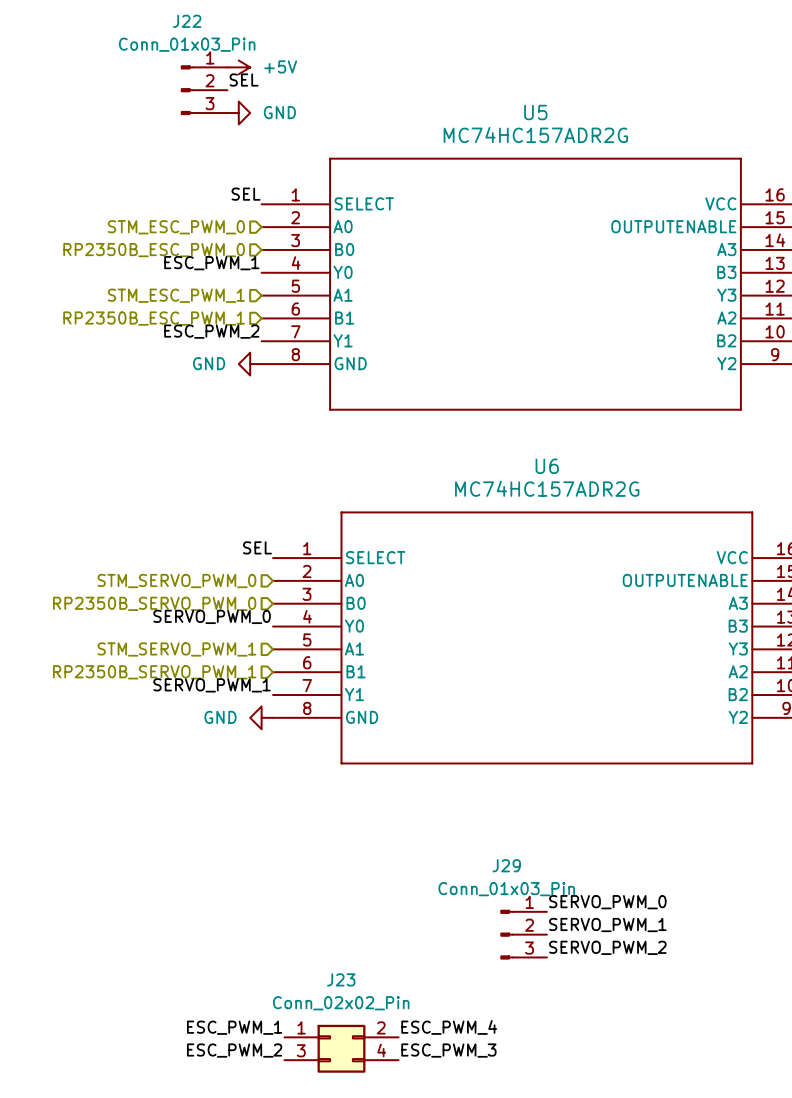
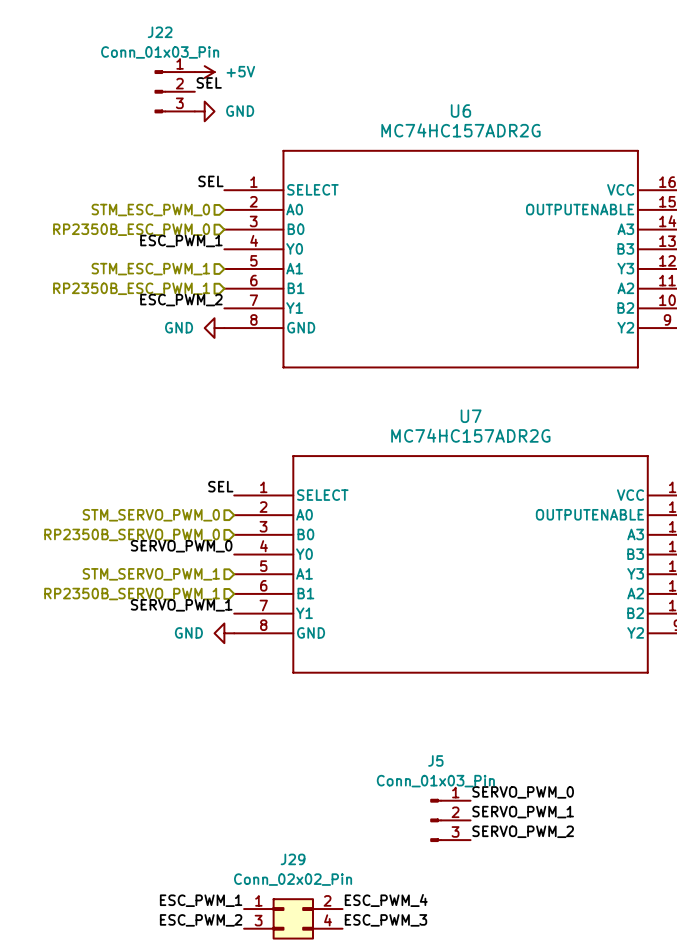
U5 name: U5 (535, 112) -> U6 (460, 111)
U6 name: U6 (547, 466) -> U7 (471, 416)
J29 name: J29 (506, 865) -> J5 (435, 760)
J23 name: J23 (341, 979) -> J29 (293, 859)

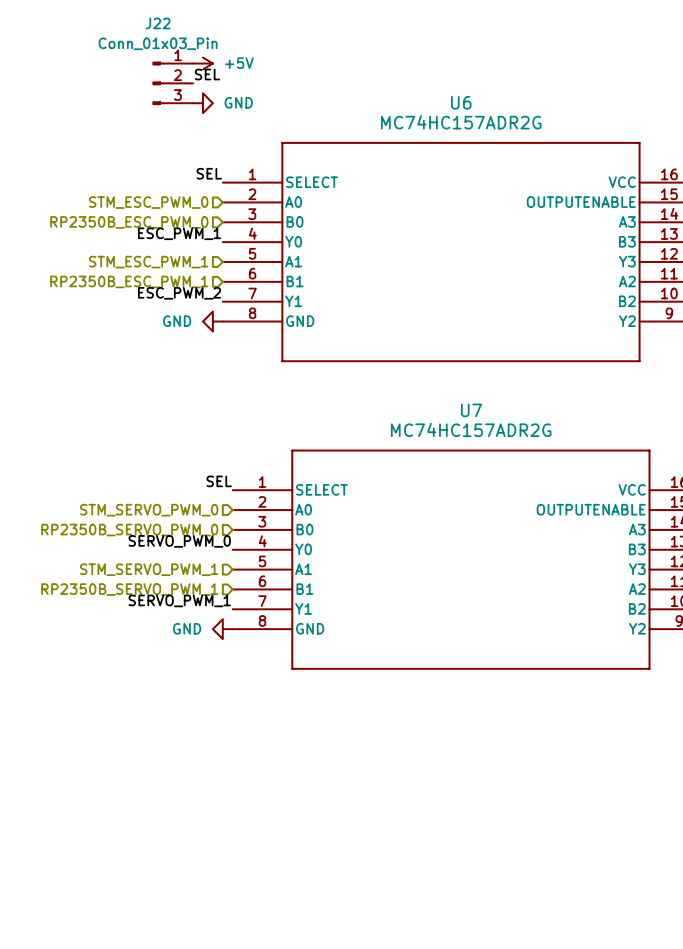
label: SERVO_PWM_0 (523, 792) -> none
label: SERVO_PWM_1 (523, 812) -> none
J5: Conn_01x03_Pin (450, 820) -> none
label: SERVO_PWM_2 (523, 831) -> none
label: ESC_PWM_1 (201, 900) -> none
label: ESC_PWM_4 (386, 900) -> none
J29: Conn_02x02_Pin (293, 918) -> none
label: ESC_PWM_2 (201, 920) -> none
label: ESC_PWM_3 (385, 920) -> none

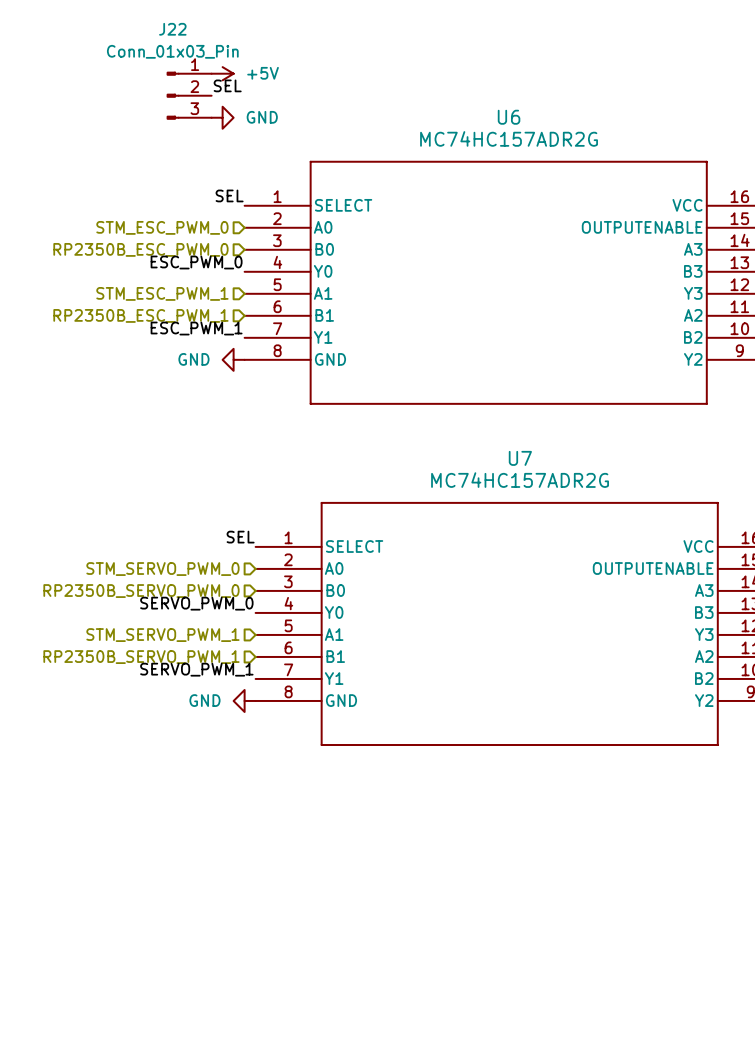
label: ESC_PWM_1 (179, 233) -> ESC_PWM_0 (196, 262)
label: ESC_PWM_2 (179, 293) -> ESC_PWM_1 (196, 328)

